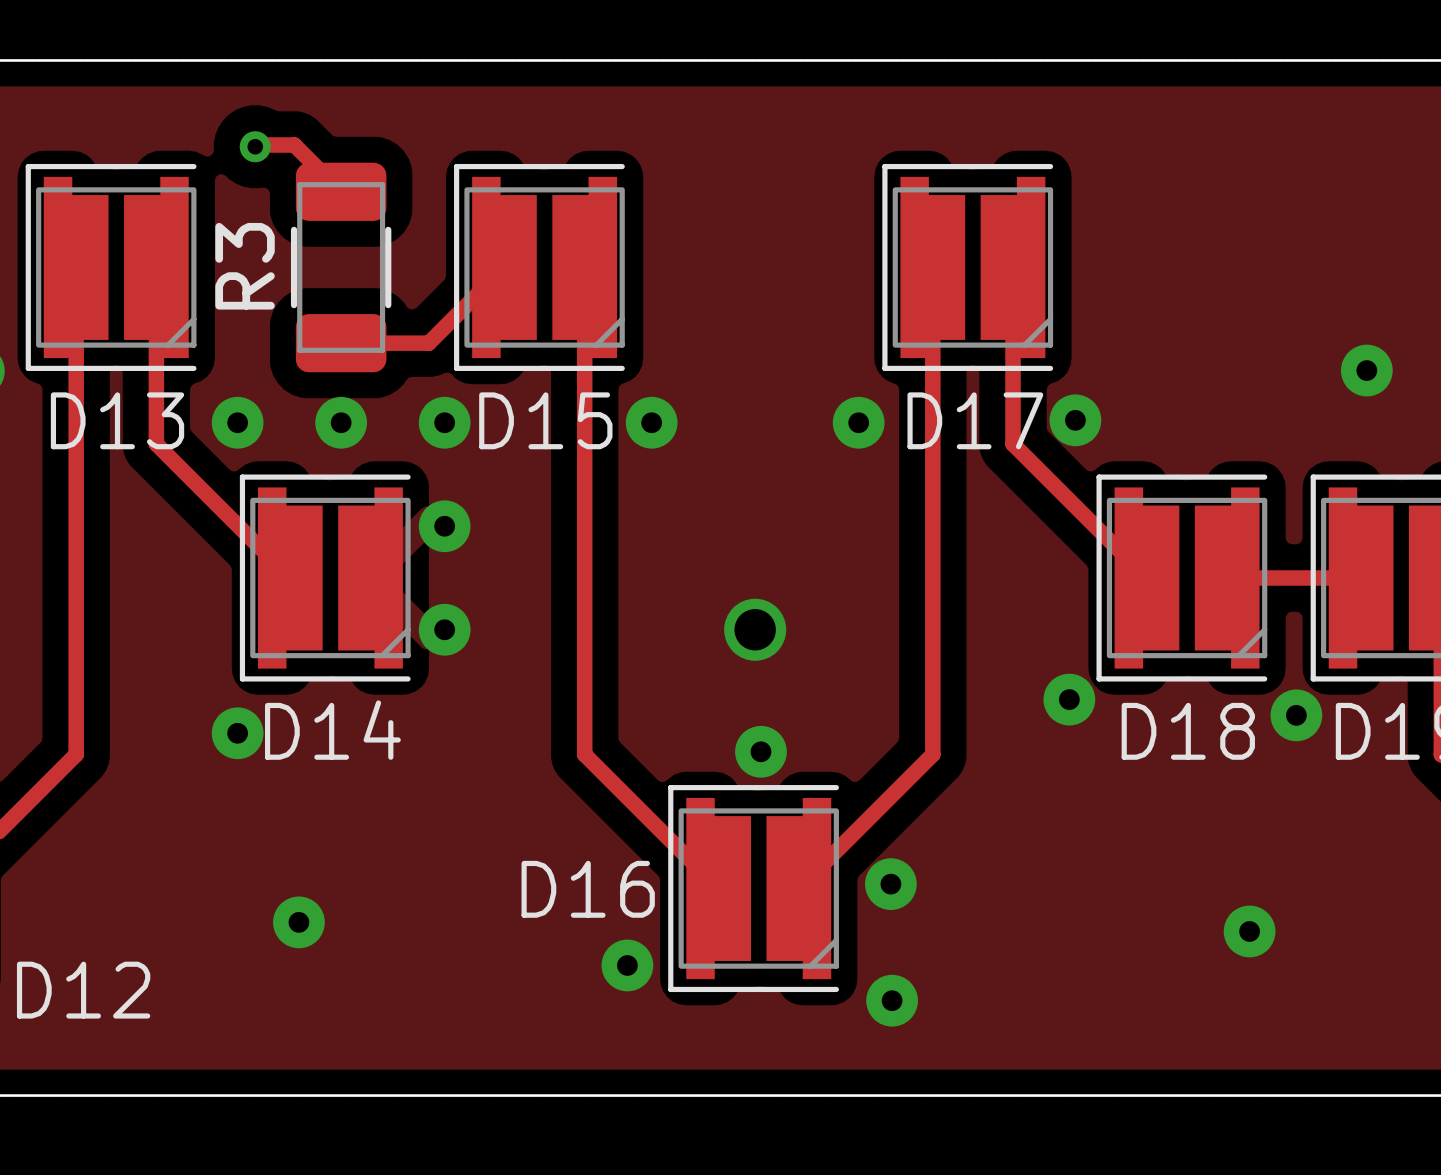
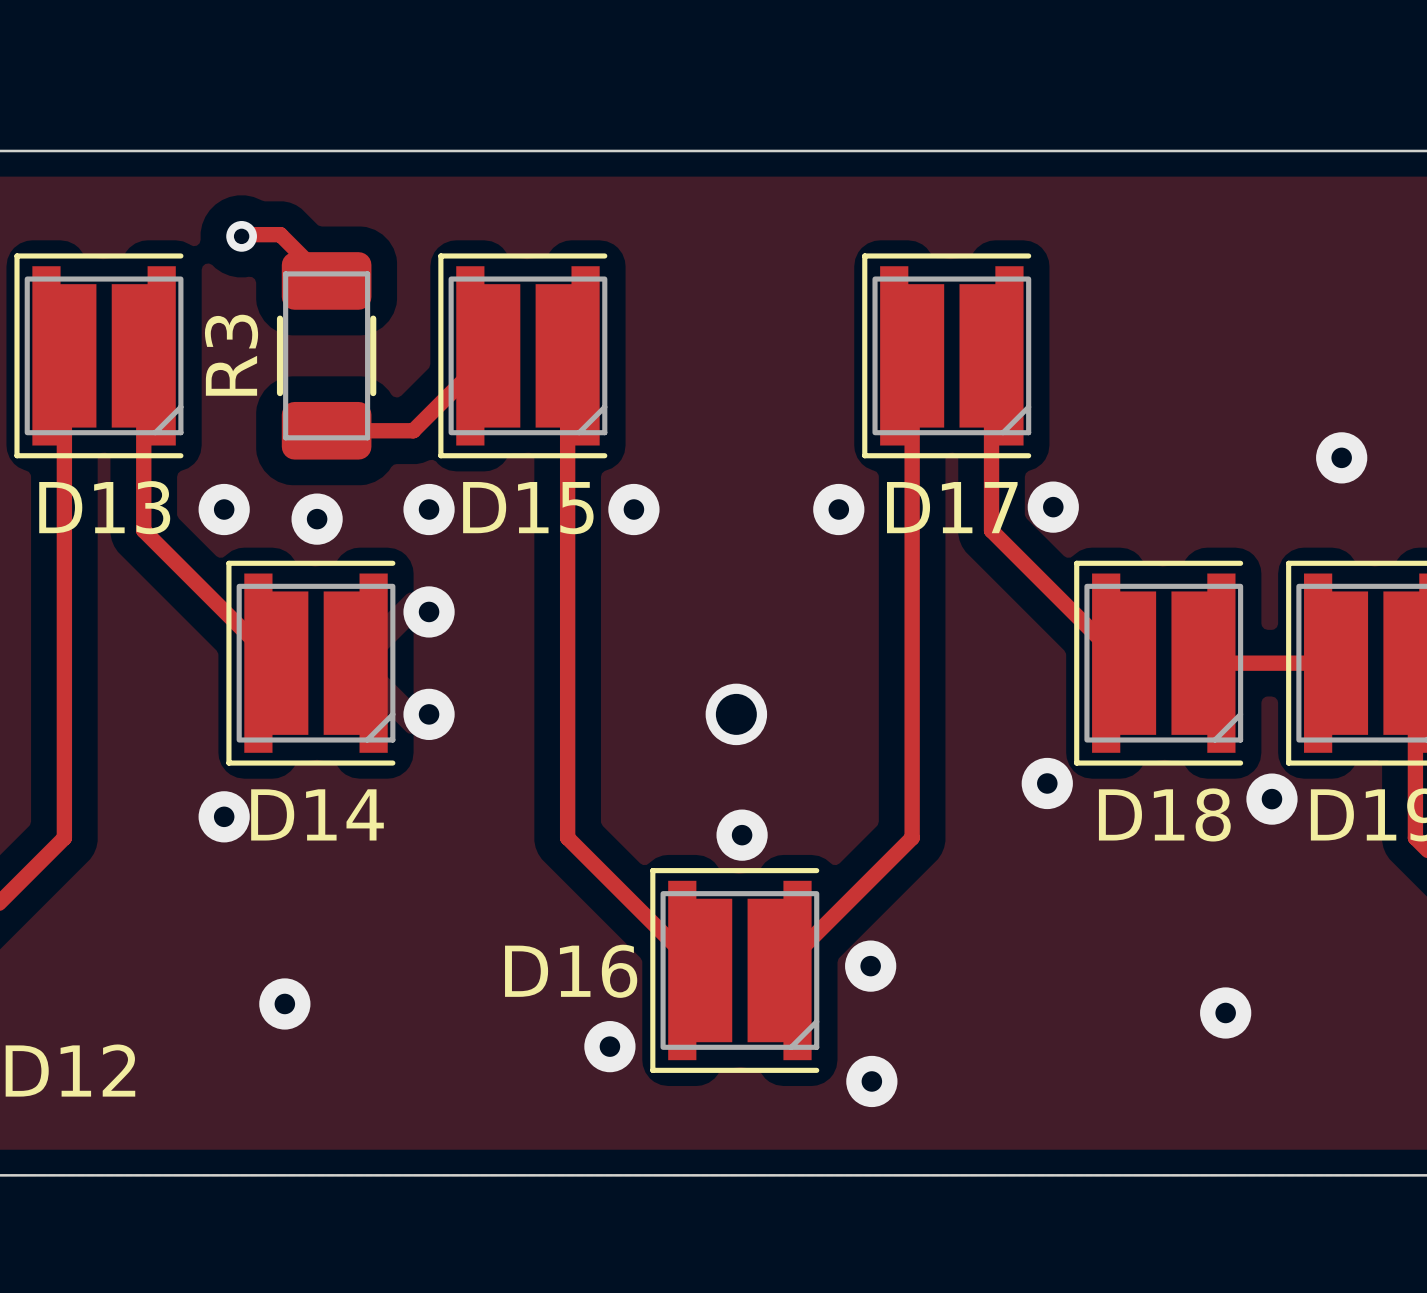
via position: (341, 422) -> (317, 519)

